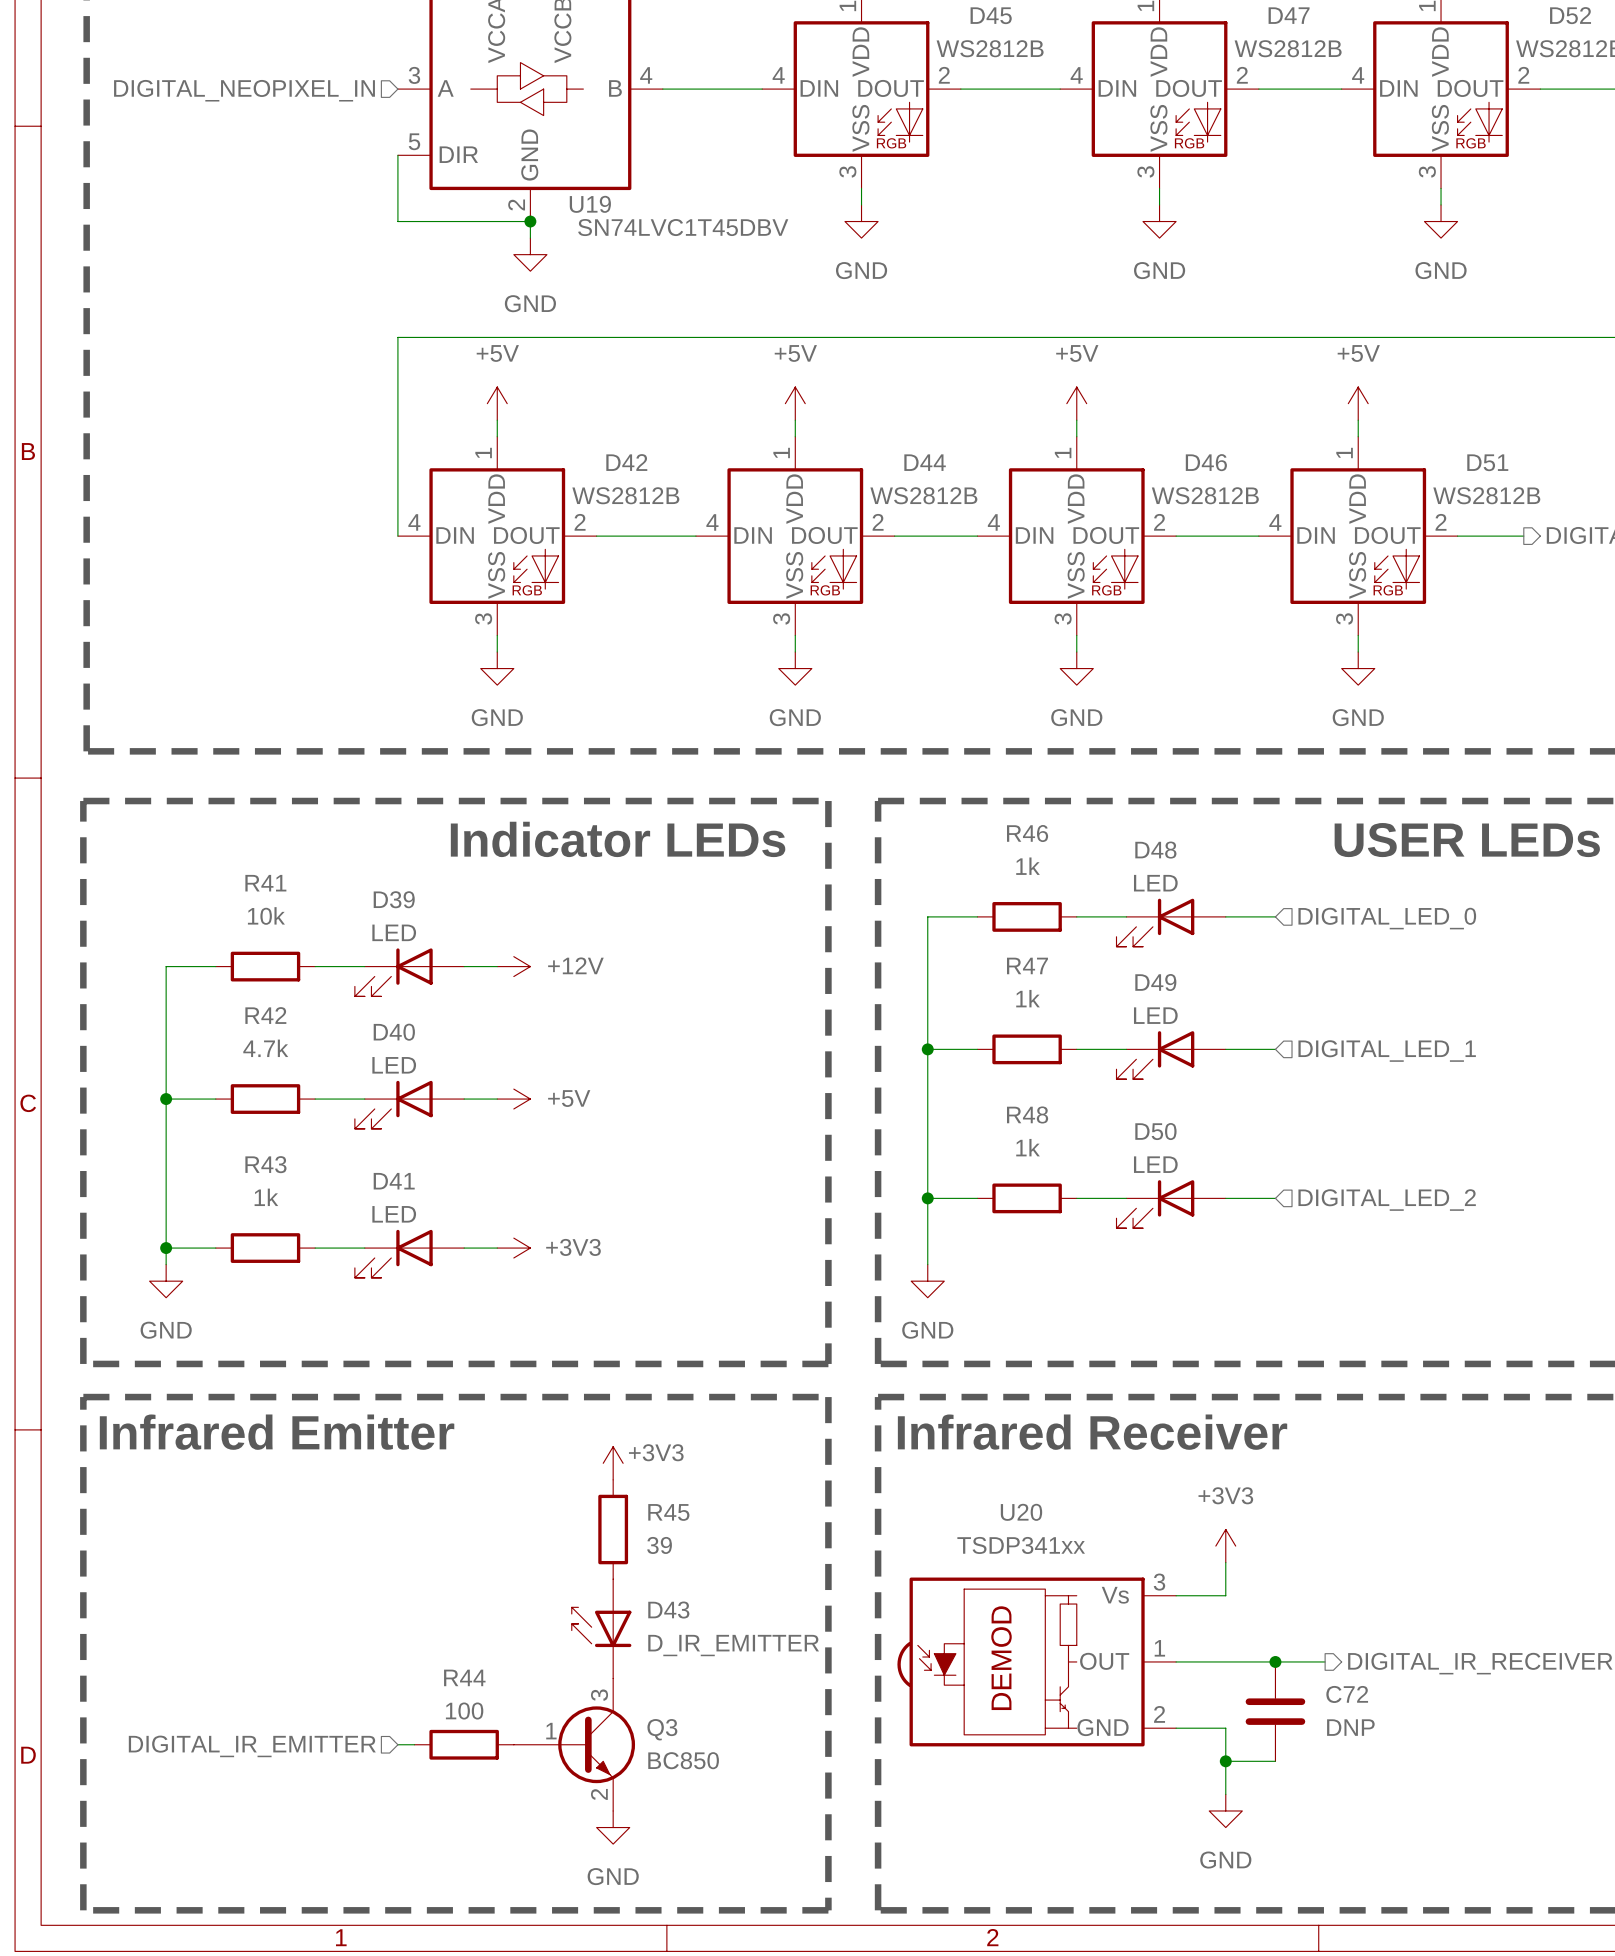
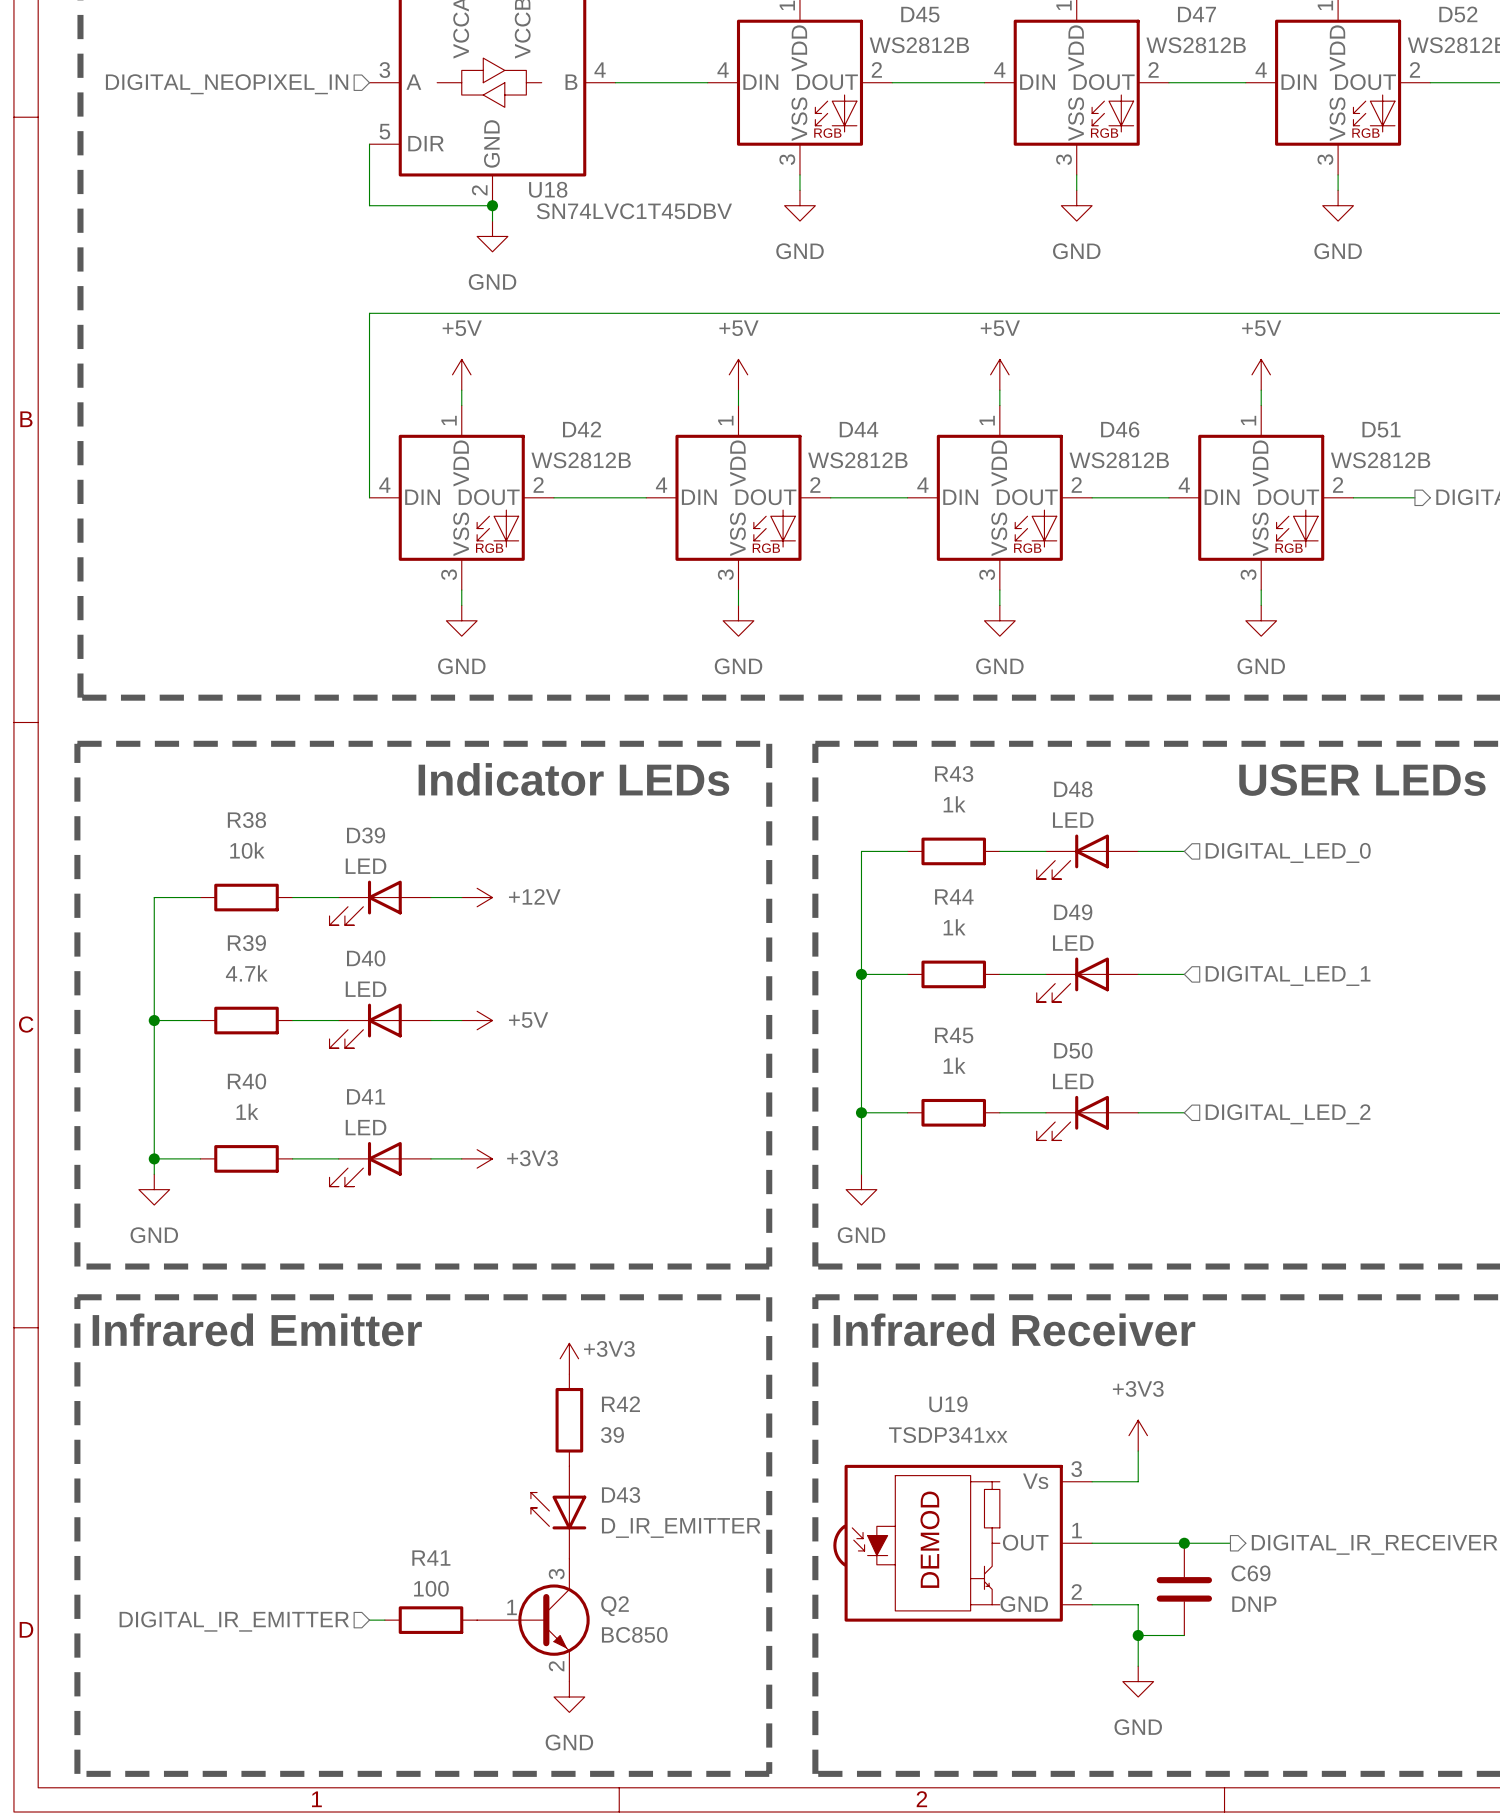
U19 name: U19 (590, 204) -> U18 (548, 189)
R46 name: R46 (1027, 833) -> R43 (954, 773)
R41 name: R41 (265, 883) -> R38 (246, 820)
R47 name: R47 (1027, 965) -> R44 (954, 896)
R42 name: R42 (265, 1015) -> R39 (246, 943)
R48 name: R48 (1027, 1114) -> R45 (954, 1035)
R43 name: R43 (265, 1164) -> R40 (246, 1081)
R45 name: R45 (668, 1512) -> R42 (620, 1404)
U20 name: U20 (1021, 1512) -> U19 (948, 1404)
R44 name: R44 (464, 1677) -> R41 (431, 1558)
C72 name: C72 (1347, 1694) -> C69 (1250, 1573)
Q3 name: Q3 (662, 1729) -> Q2 (614, 1606)

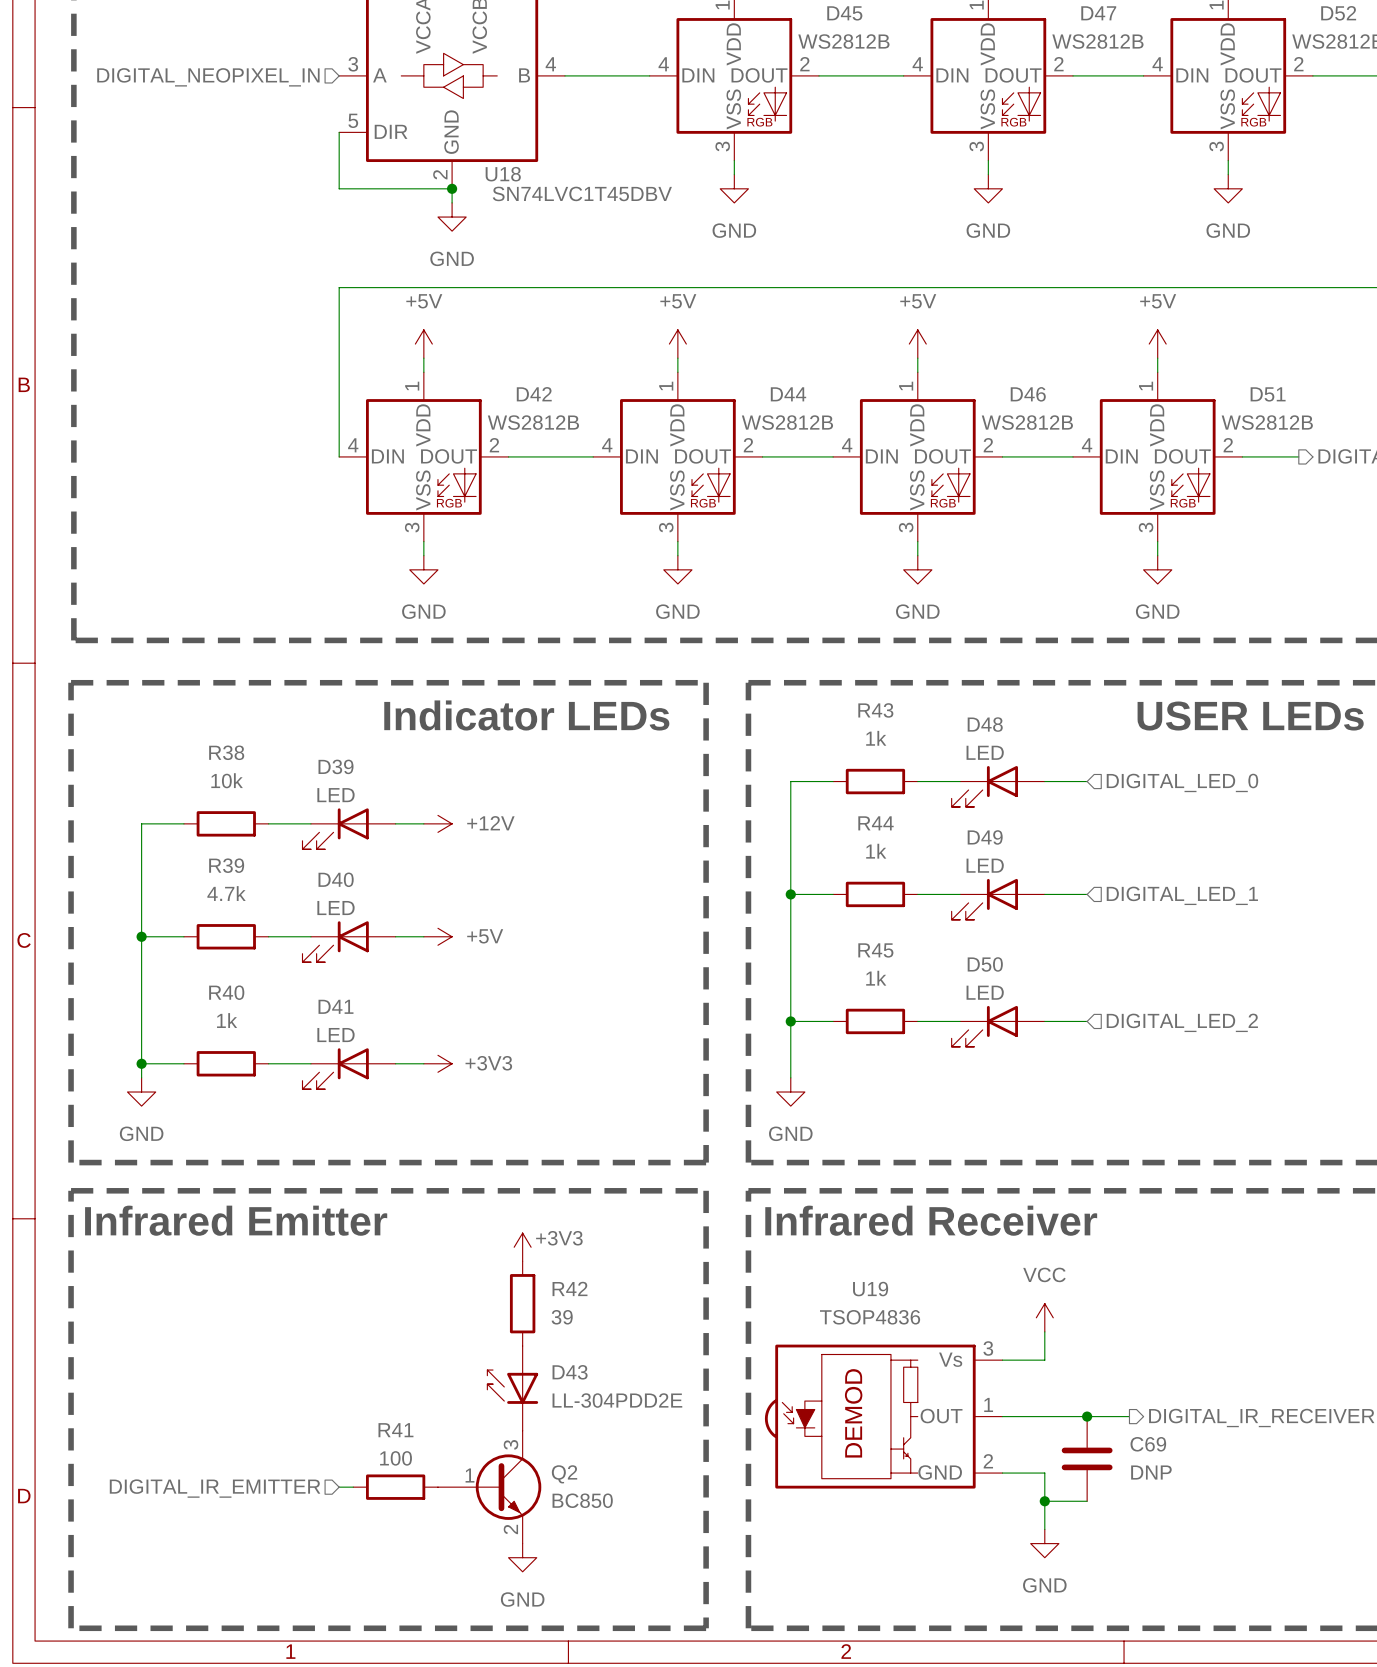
U19 value: TSDP341xx (948, 1435) -> TSOP4836 (870, 1317)
power symbol: +3V3 (1138, 1435) -> VCC (1044, 1317)
D43 value: D_IR_EMITTER (681, 1527) -> LL-304PDD2E (617, 1400)

